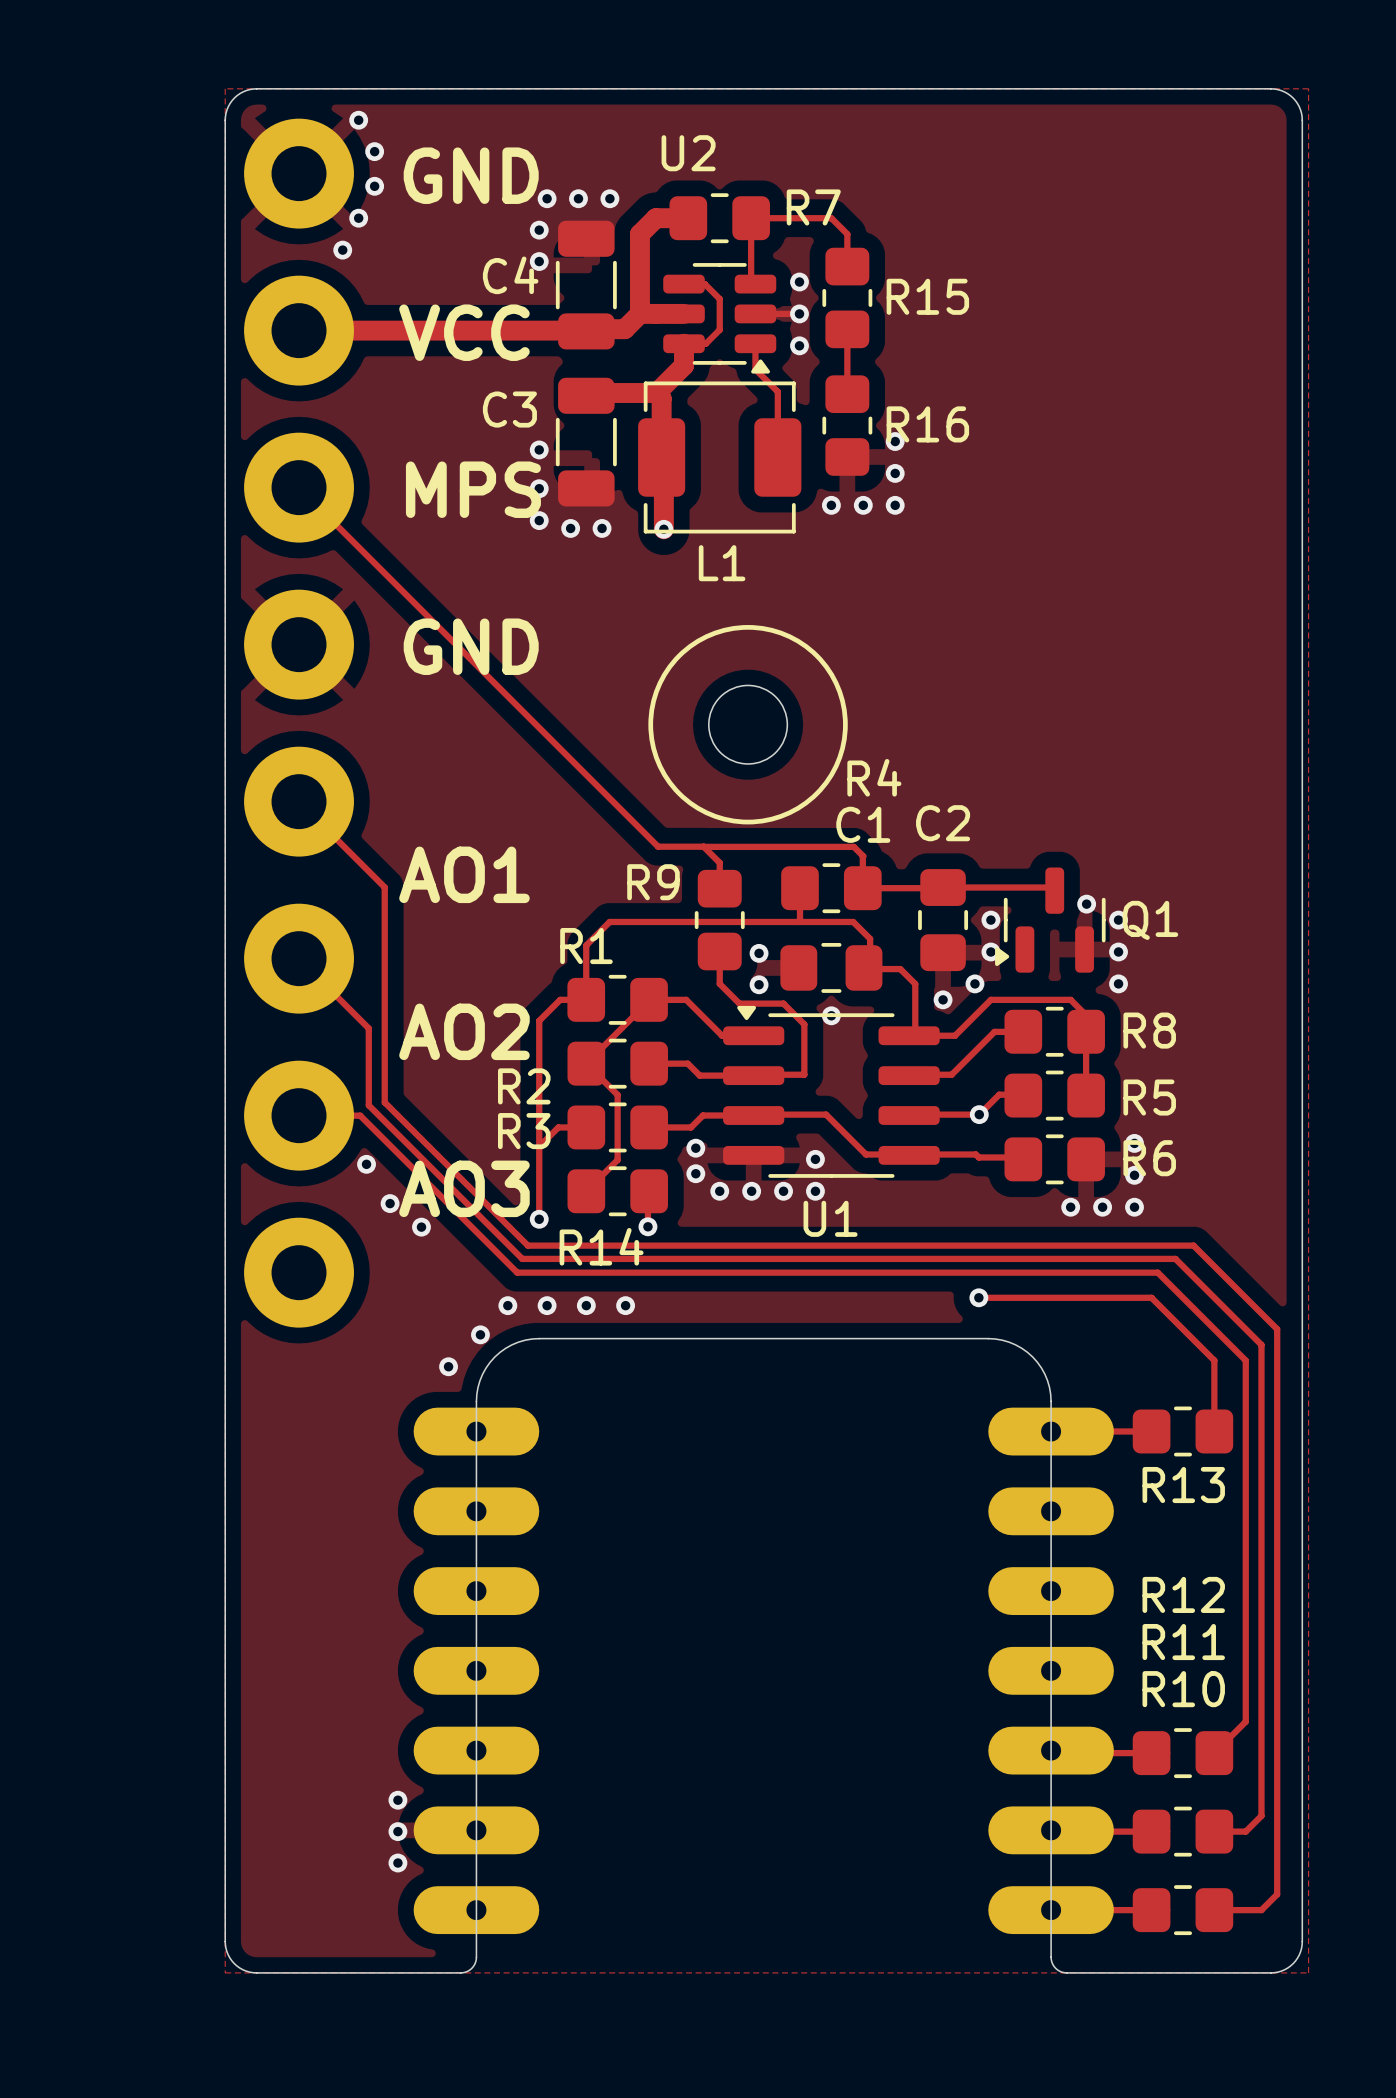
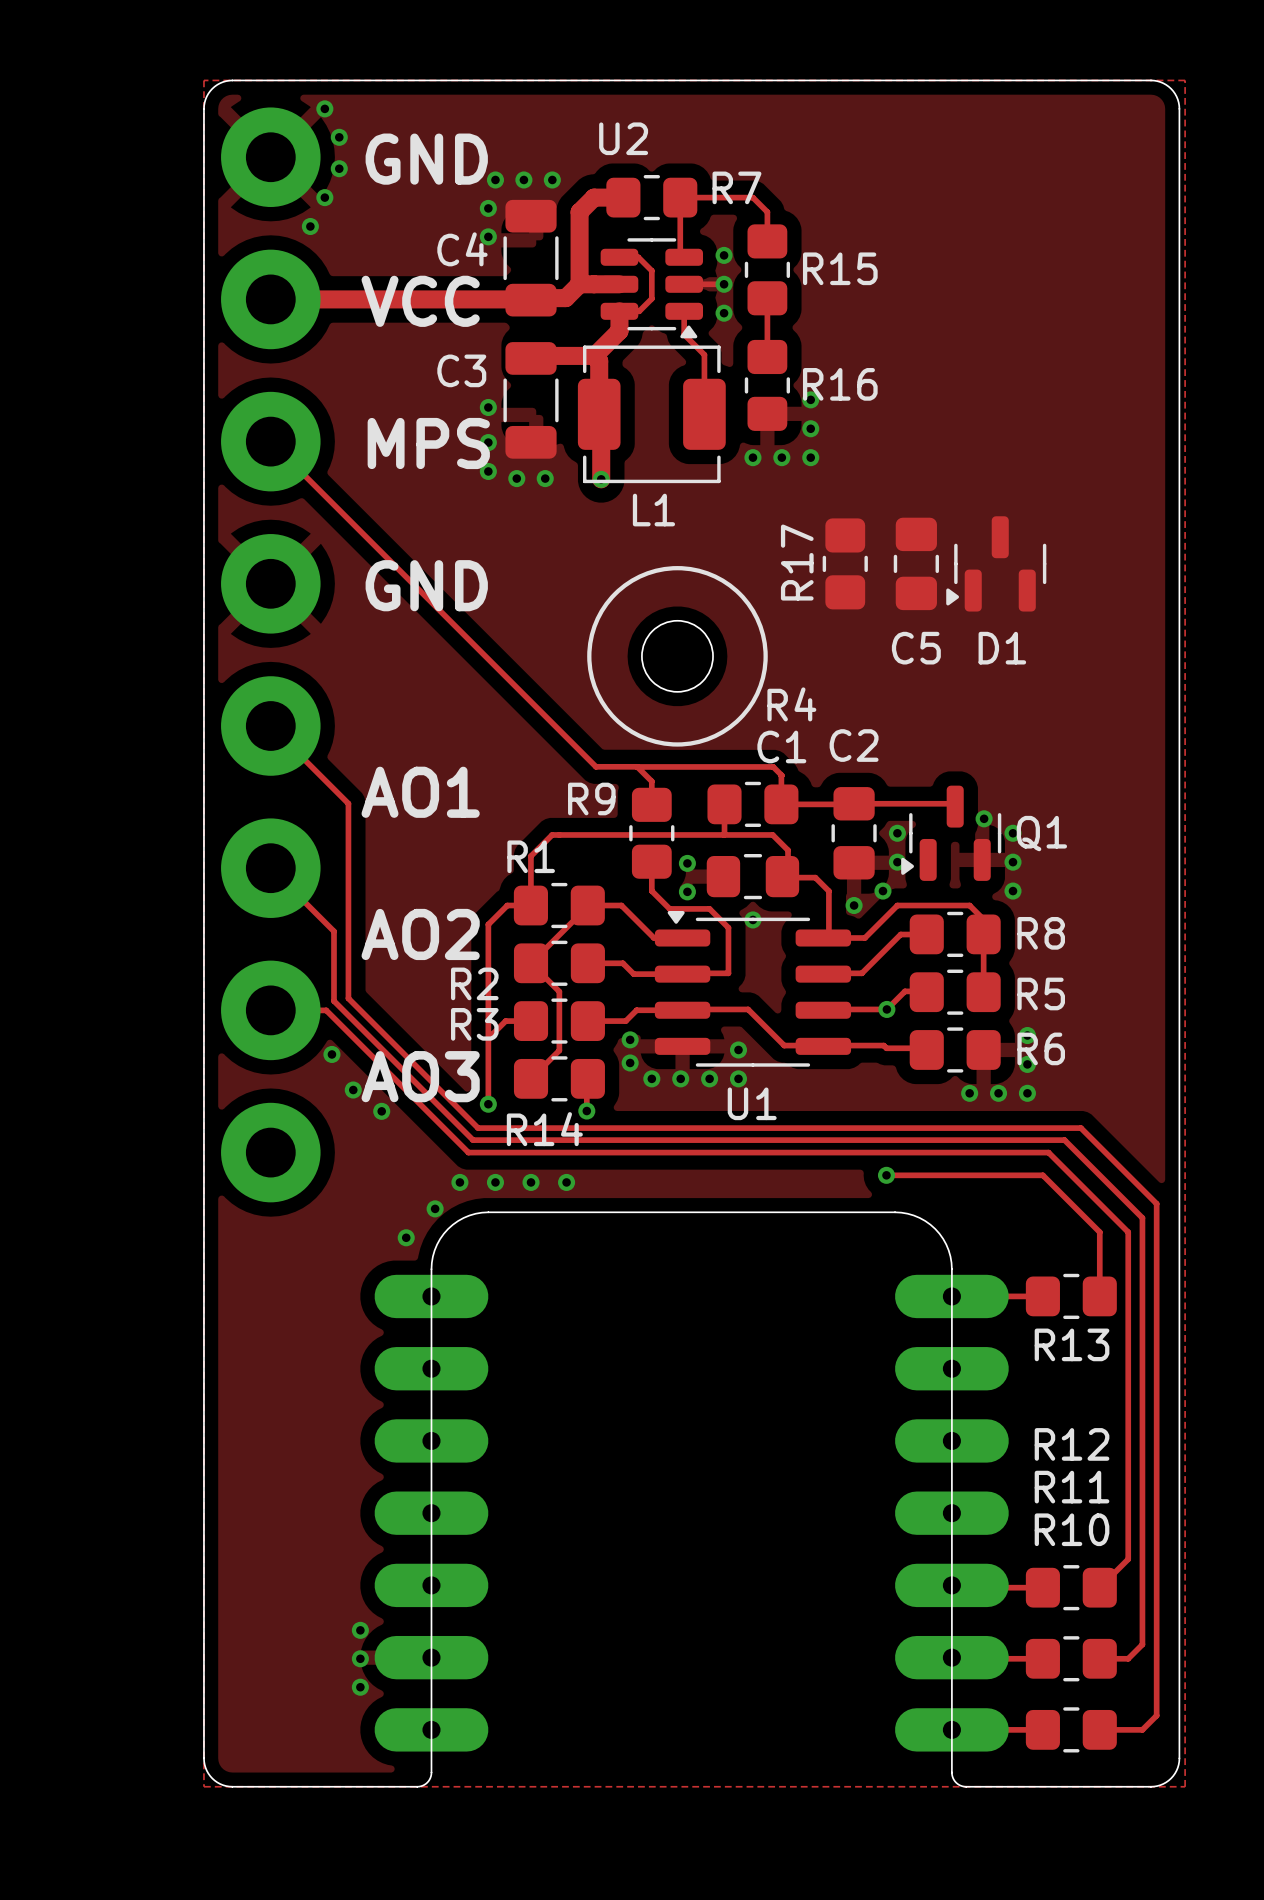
R17: none -> (845, 563)
C5: none -> (916, 563)
D1: none -> (996, 563)

